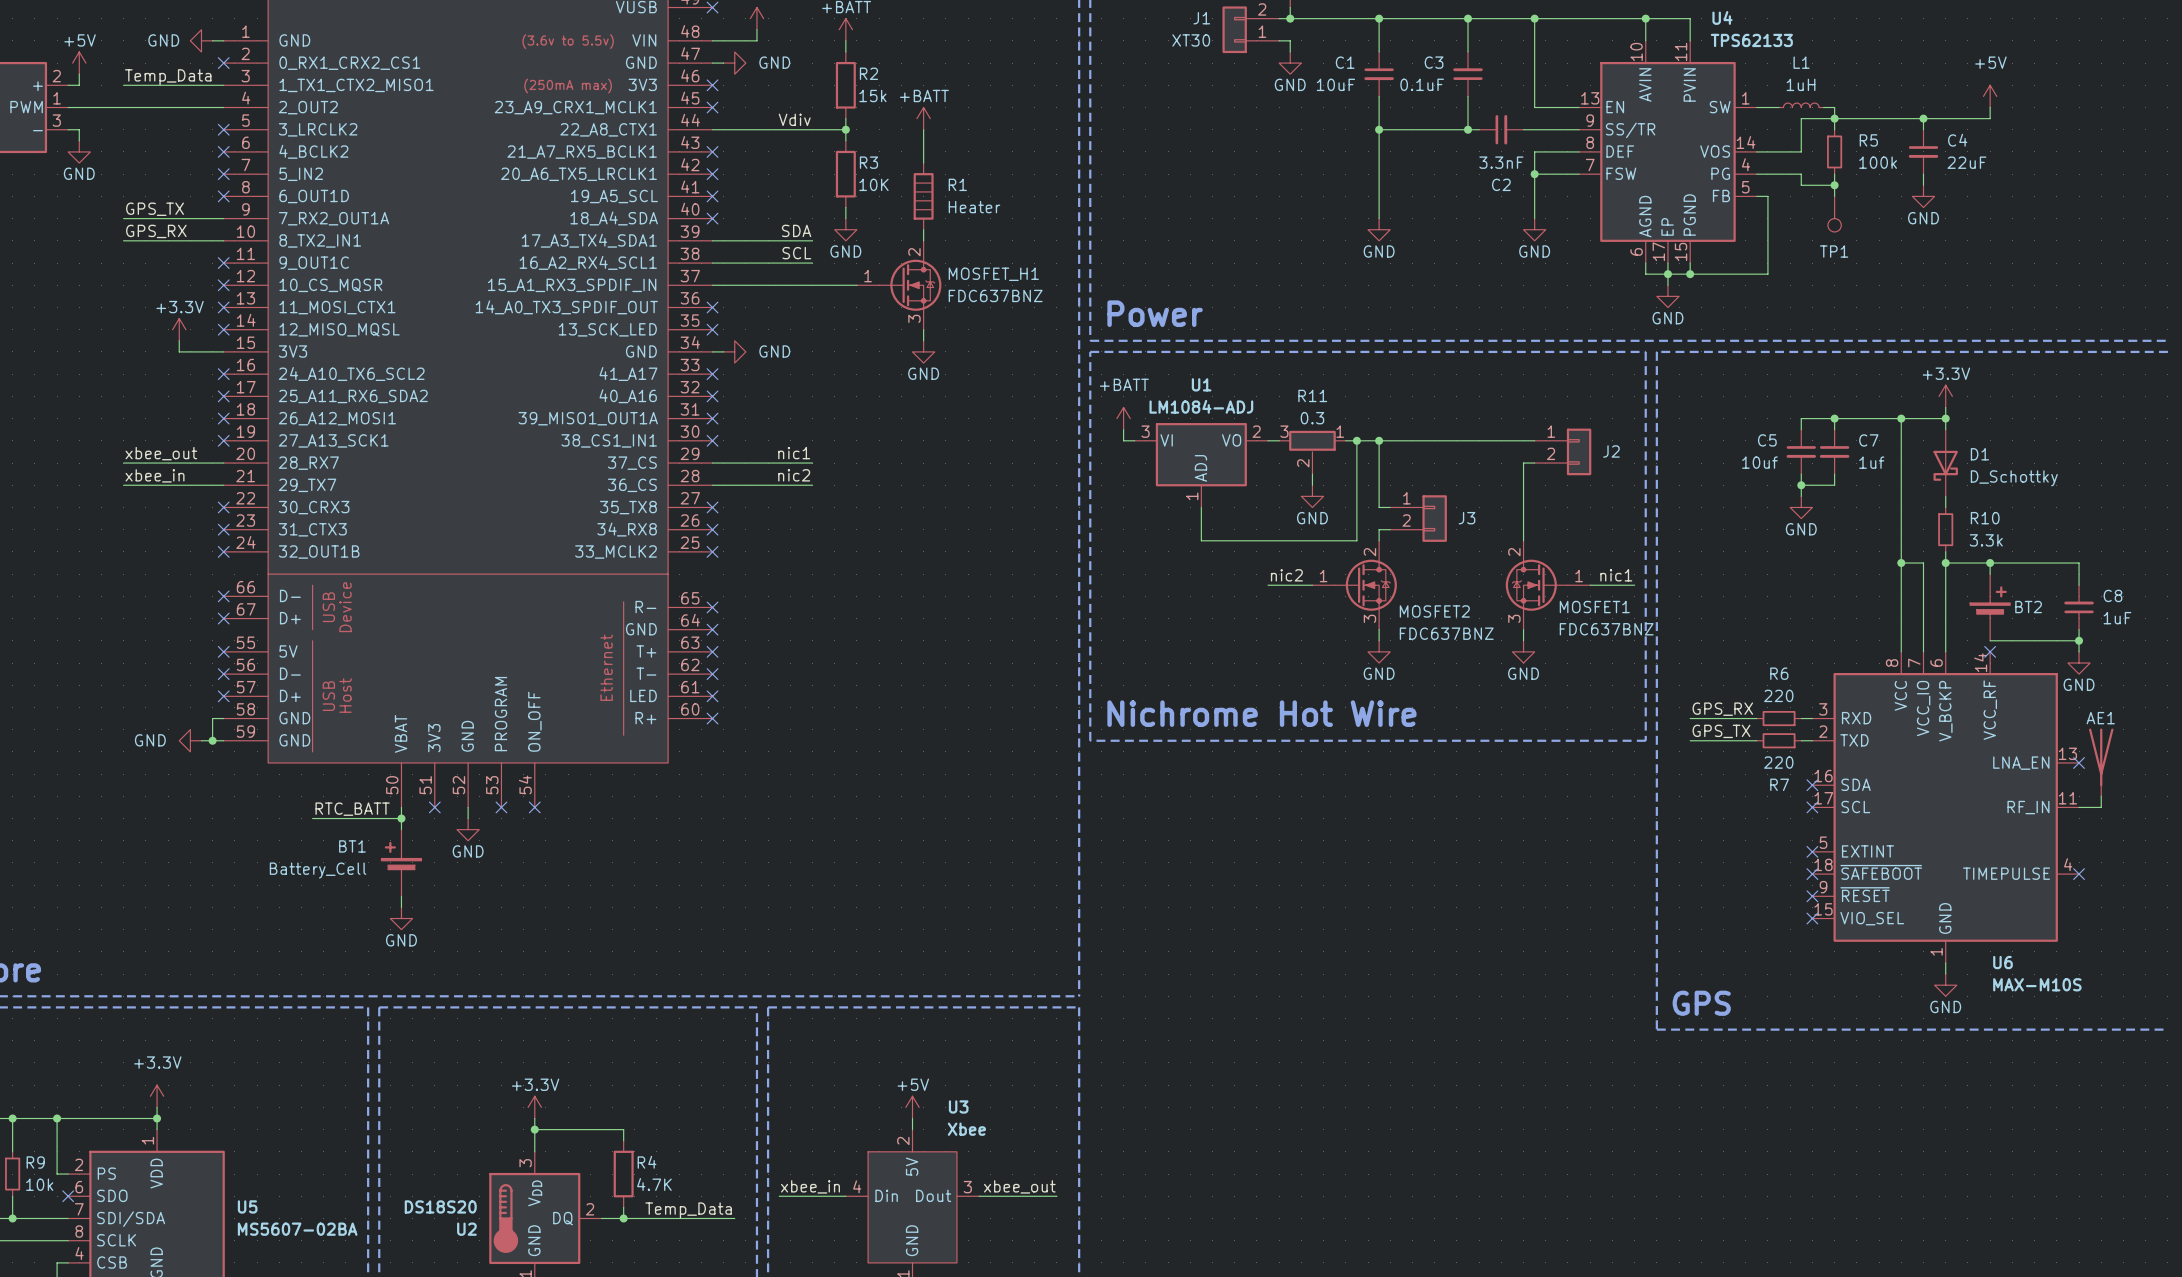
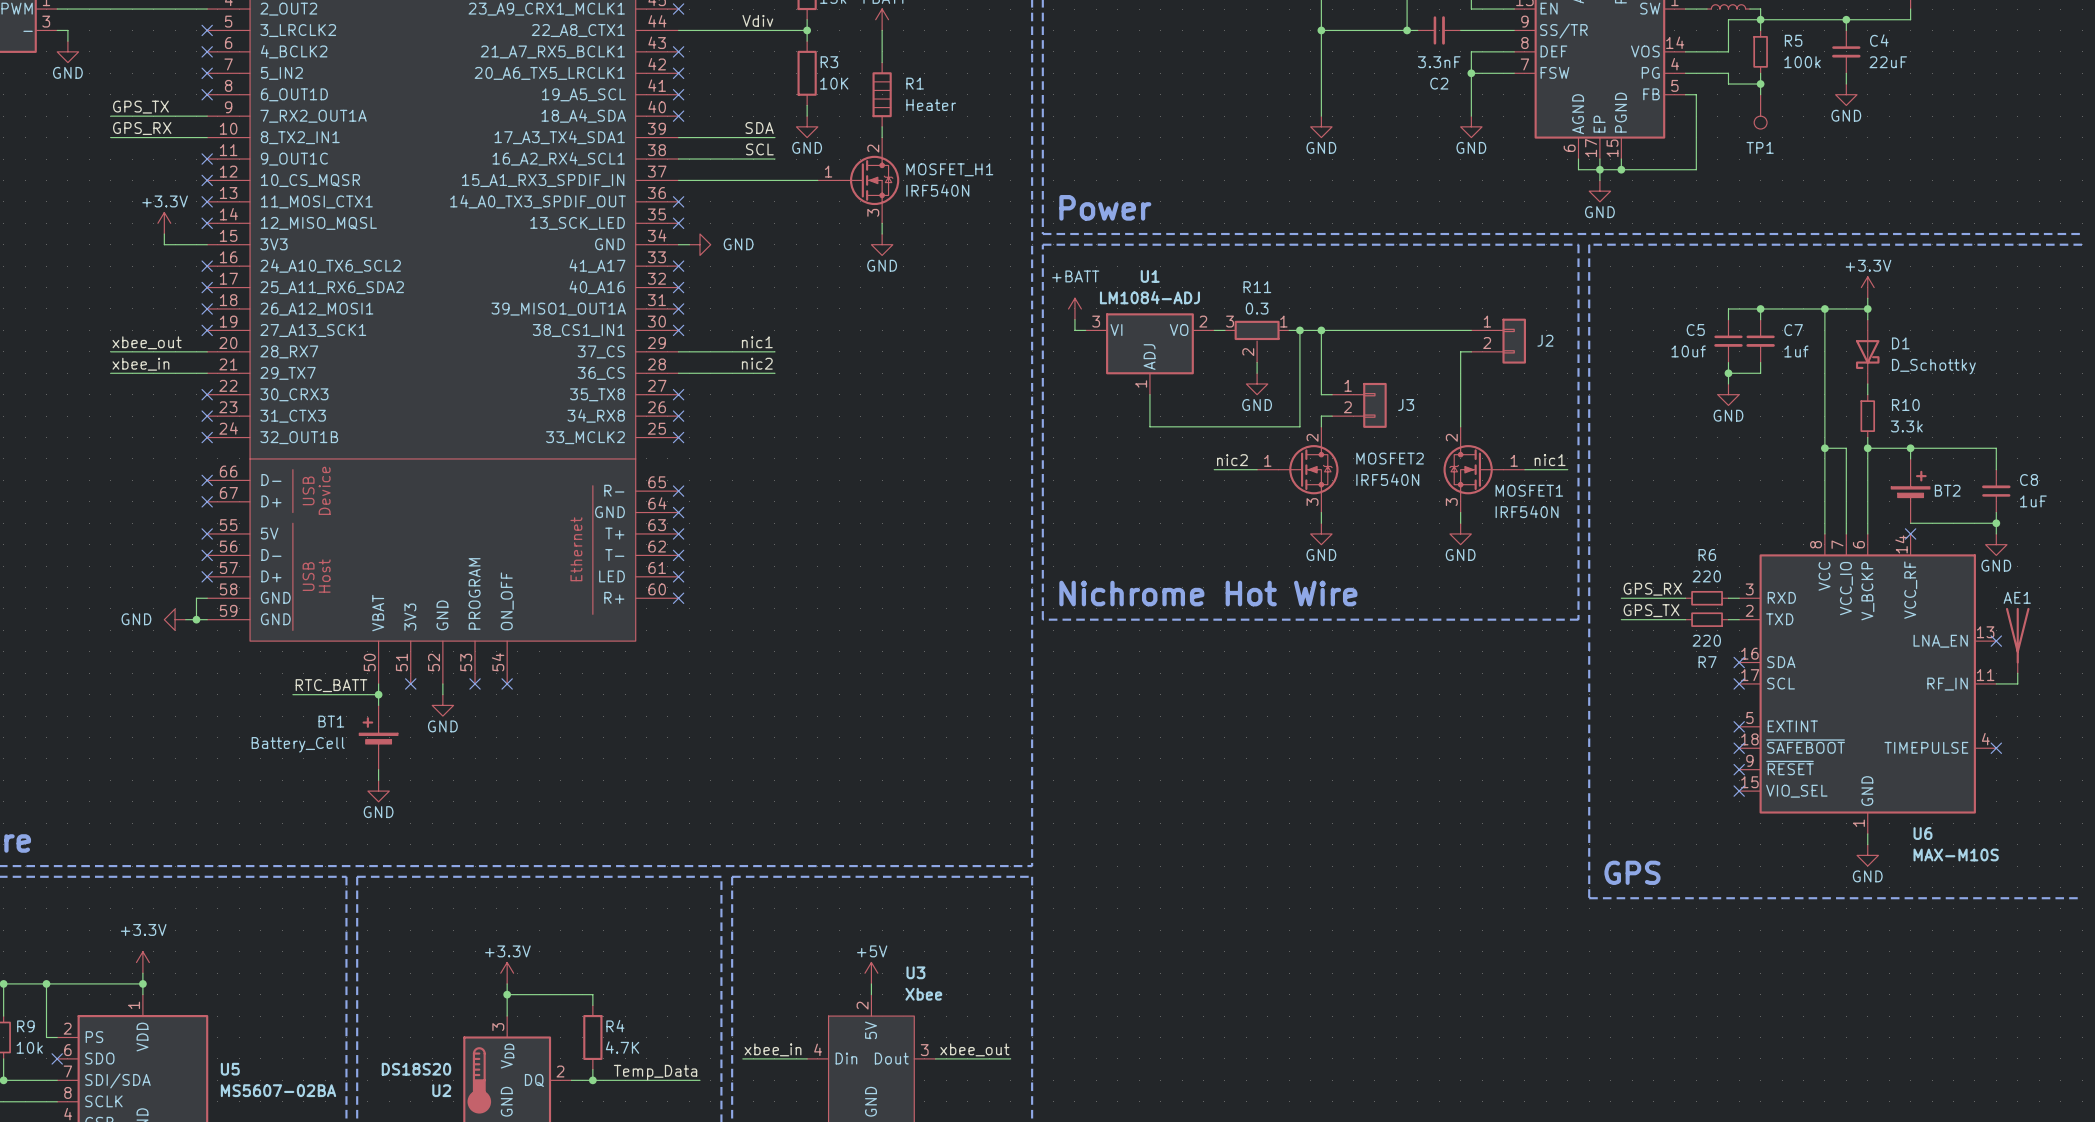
MOSFET_H1 value: FDC637BNZ (995, 295) -> IRF540N (937, 190)
MOSFET2 name position: MOSFET2 (1434, 611) -> MOSFET2 (1390, 458)
MOSFET1 value: FDC637BNZ (1606, 629) -> IRF540N (1527, 511)
MOSFET2 value: FDC637BNZ (1446, 633) -> IRF540N (1387, 479)

